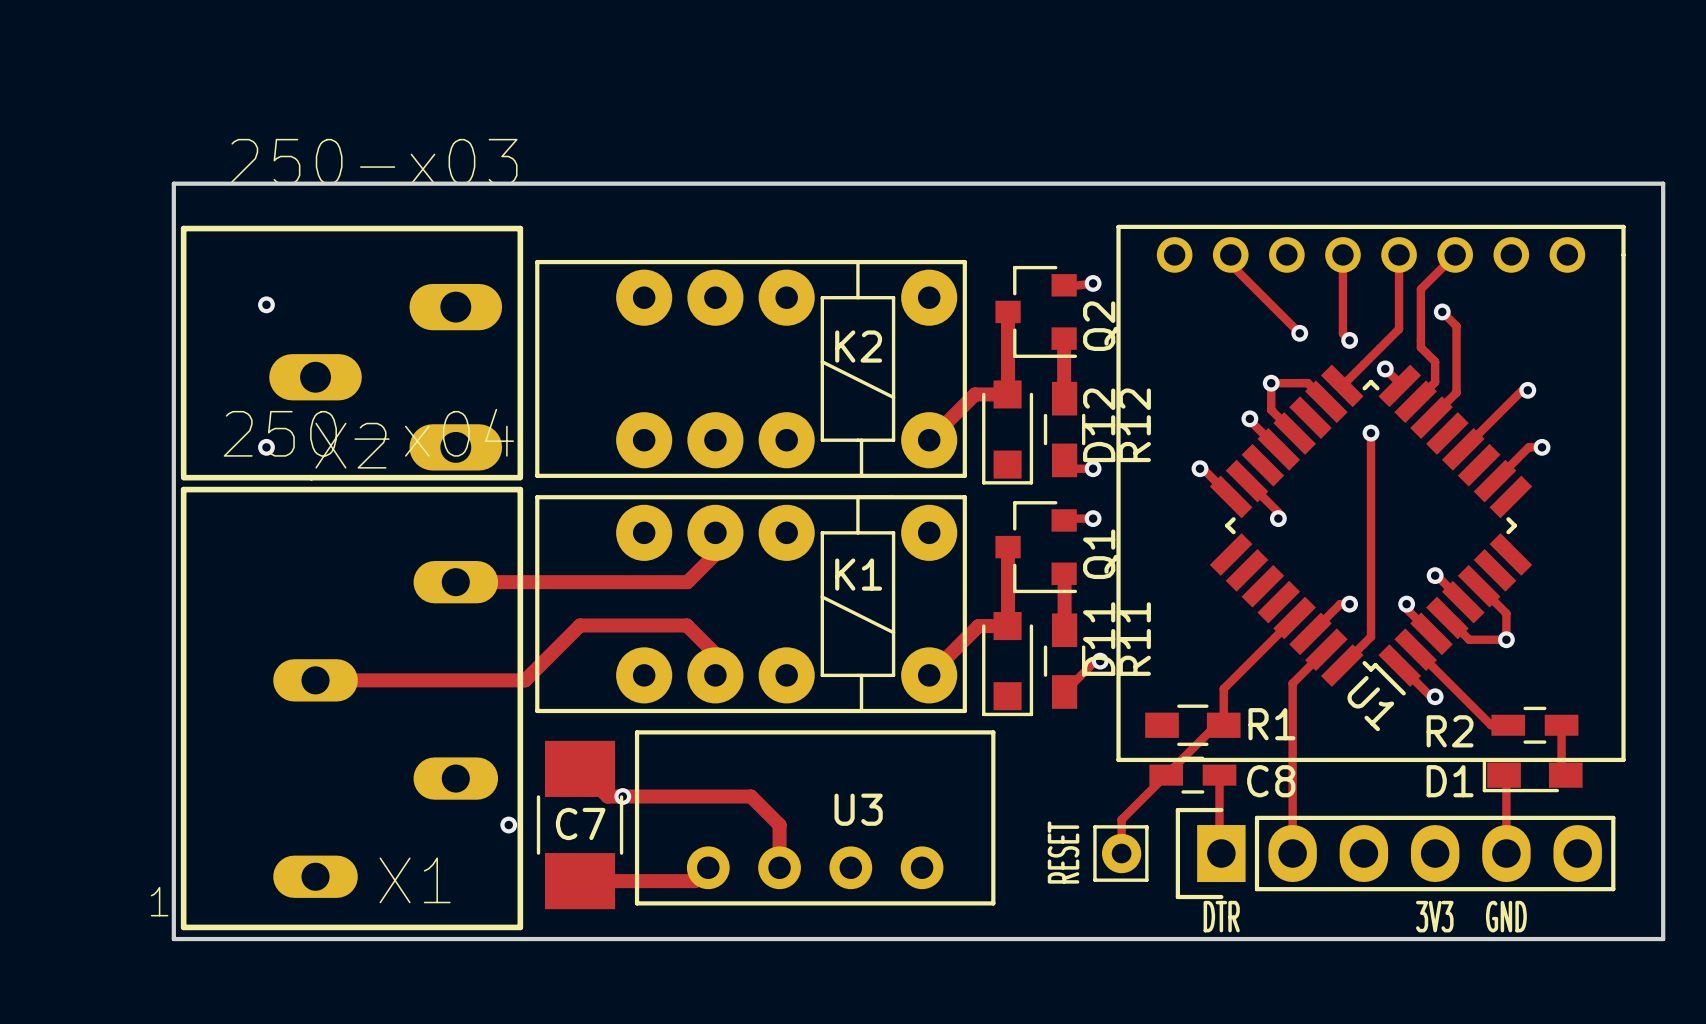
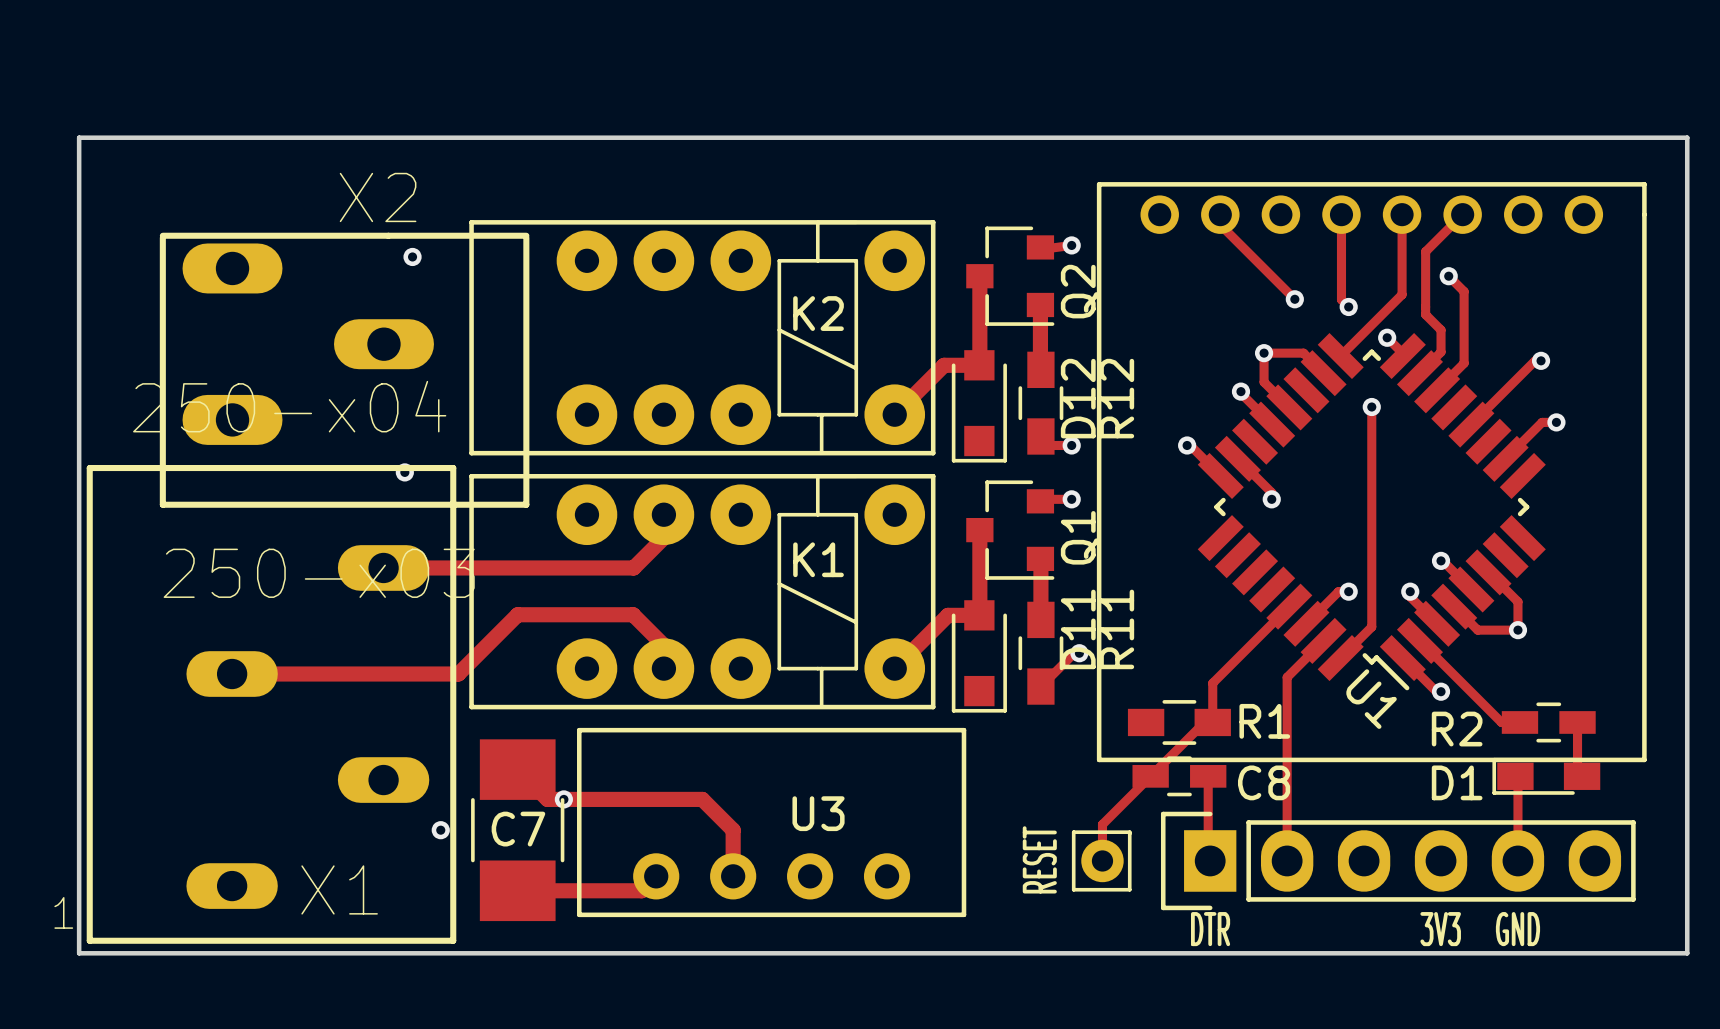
via: none -> (412, 256)
via: (266, 304) -> none
X2 rotation: 0° (351, 353) -> 180° (344, 370)
X2 name position: X2 (350, 445) -> X2 (378, 197)
via: (266, 447) -> none
via: none -> (404, 472)

